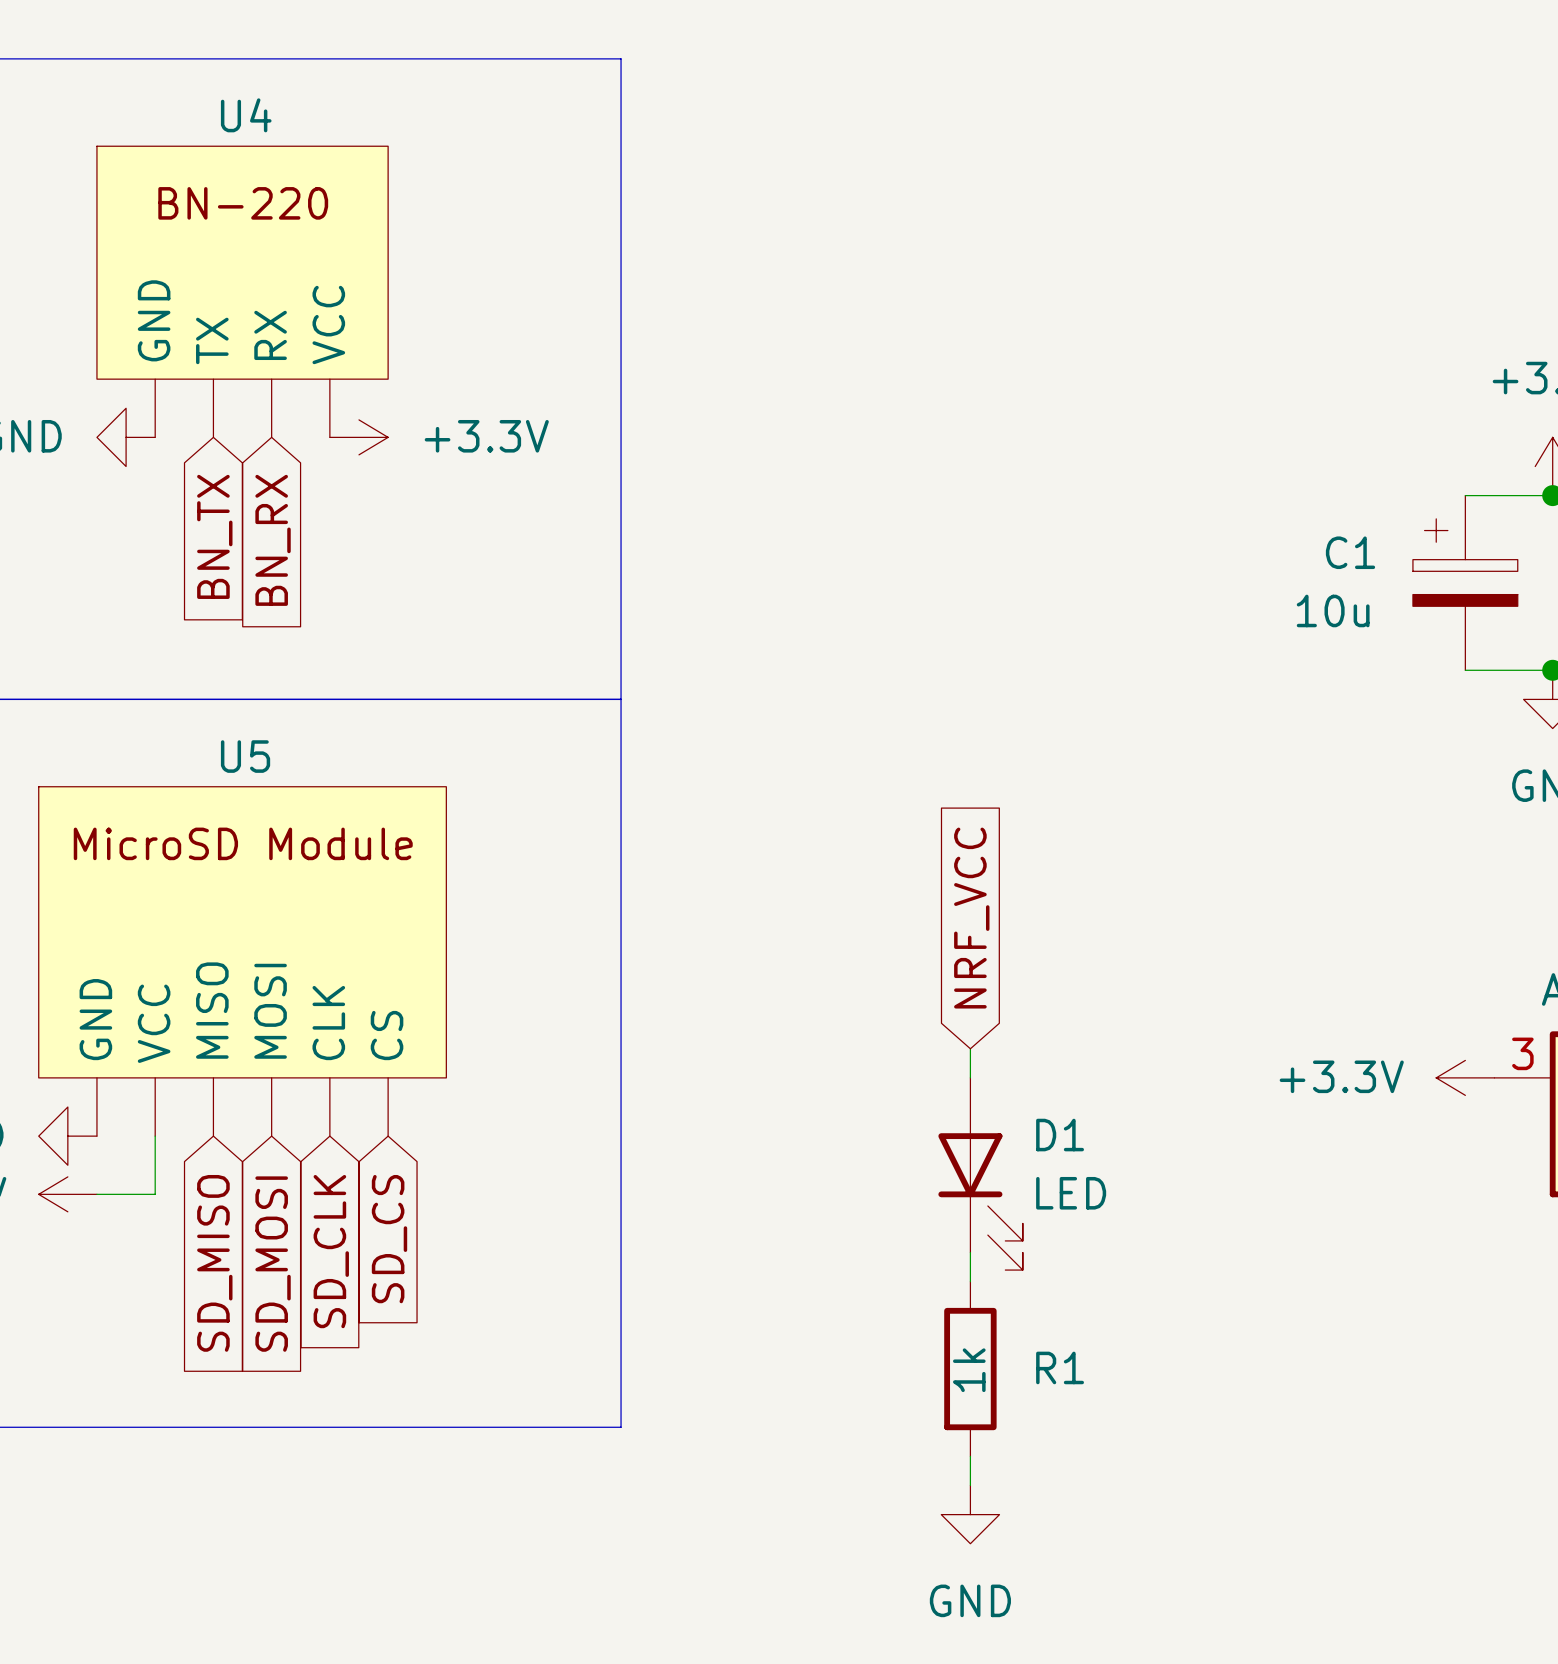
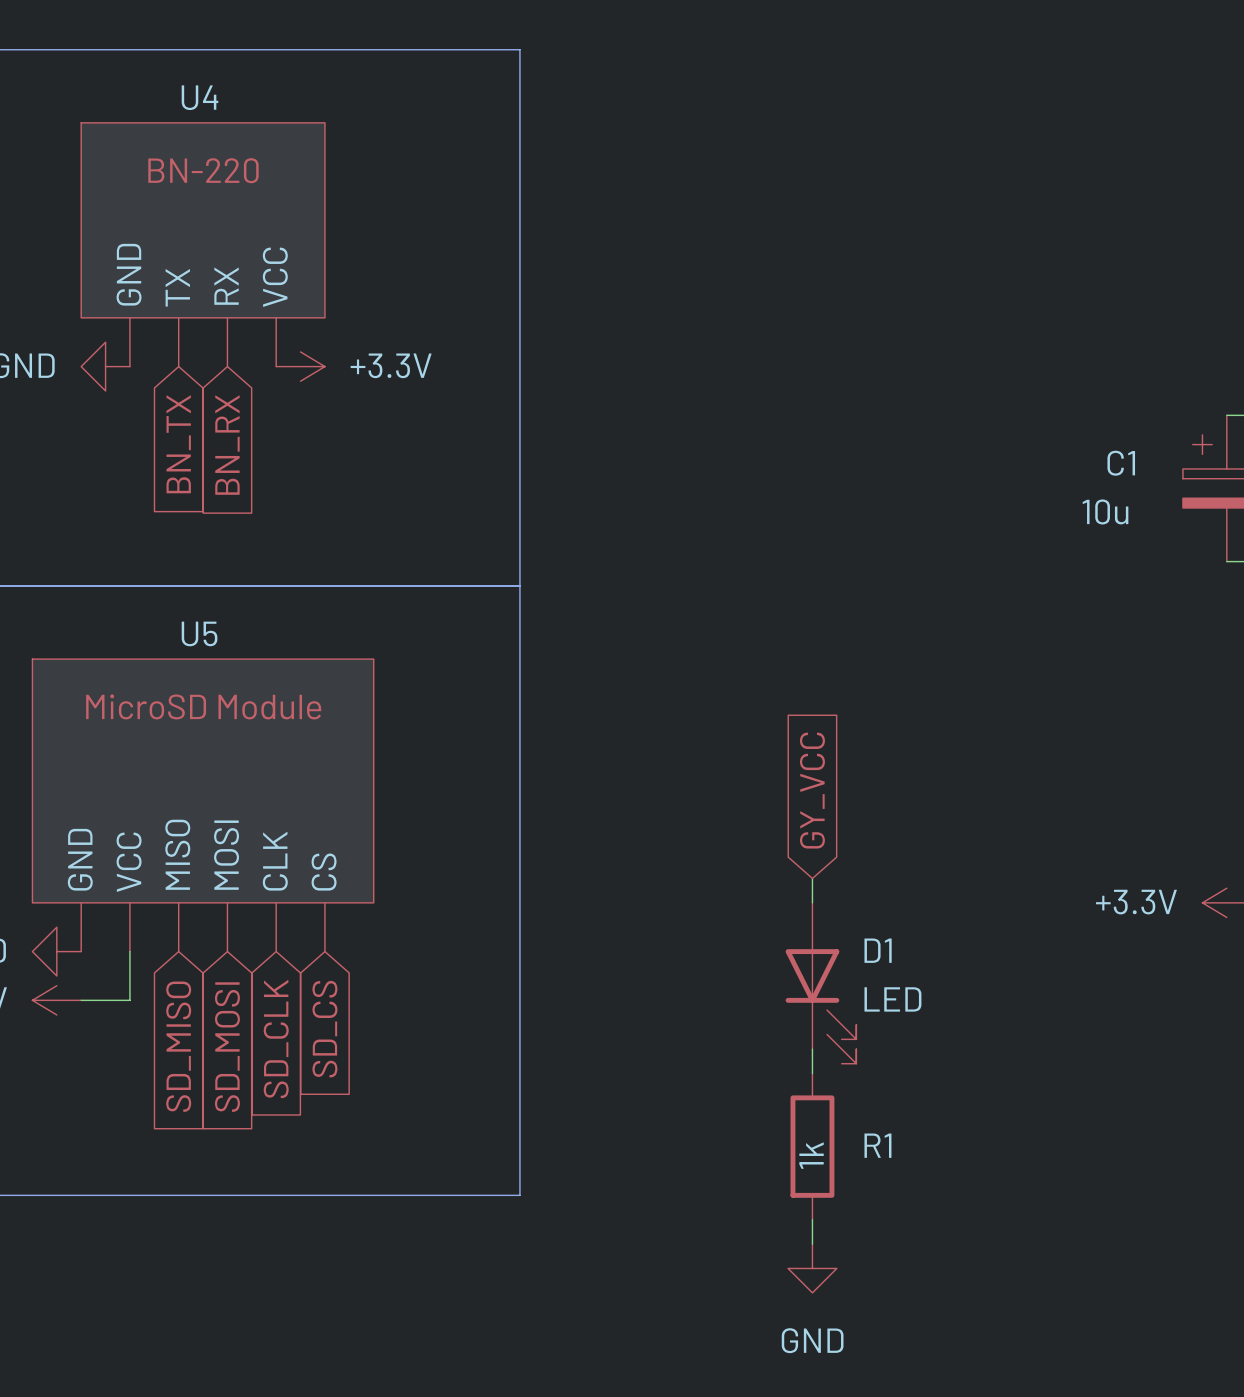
global label: NRF_VCC (971, 918) -> GY_VCC (812, 790)

